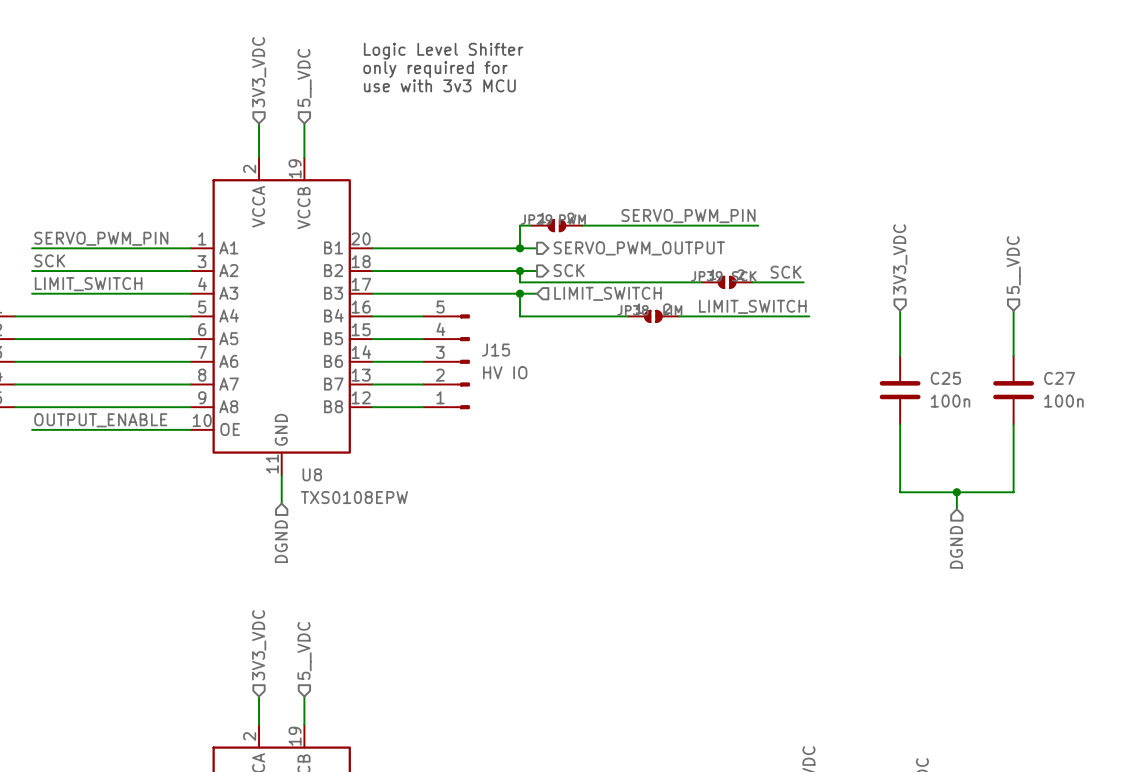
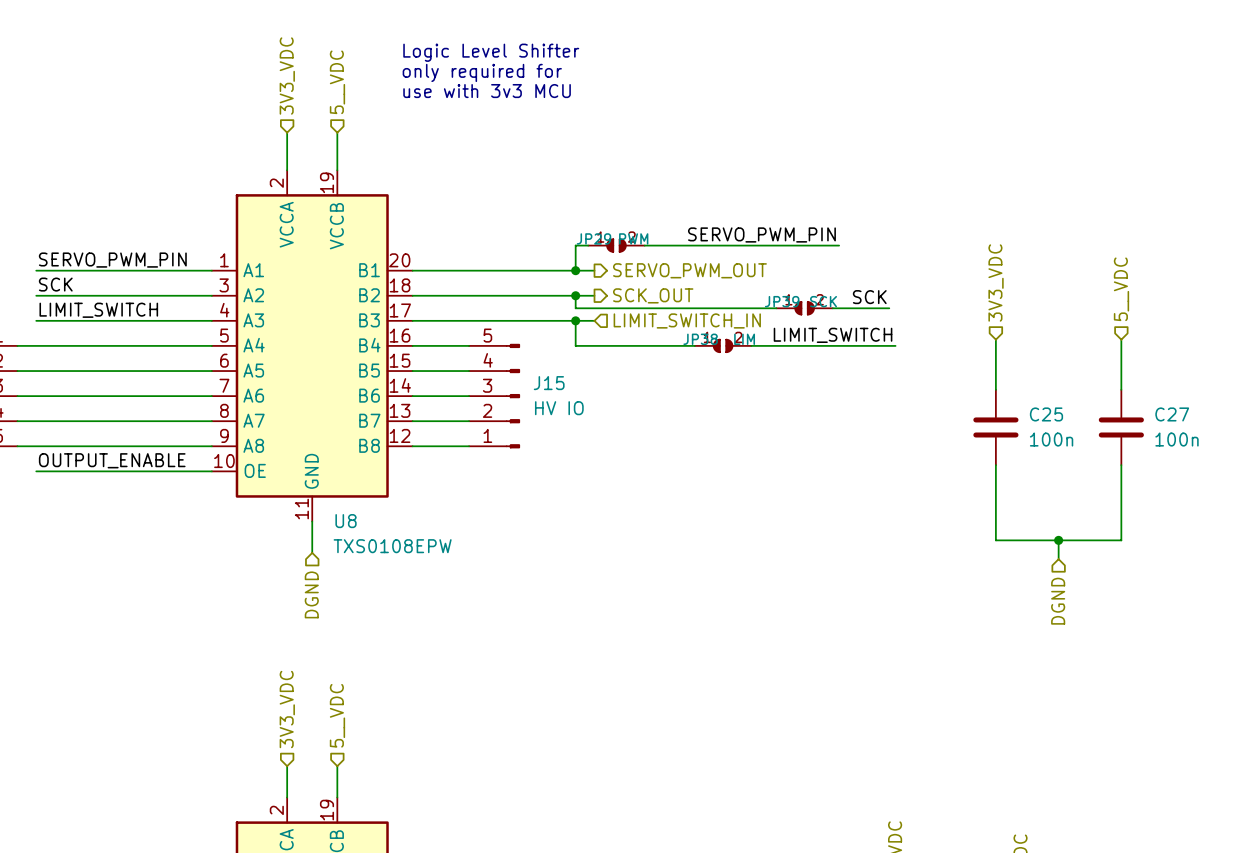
hierarchical label: SERVO_PWM_OUTPUT (639, 248) -> SERVO_PWM_OUT (689, 270)
hierarchical label: SCK (569, 270) -> SCK_OUT (653, 295)
hierarchical label: LIMIT_SWITCH (607, 293) -> LIMIT_SWITCH_IN (687, 320)

